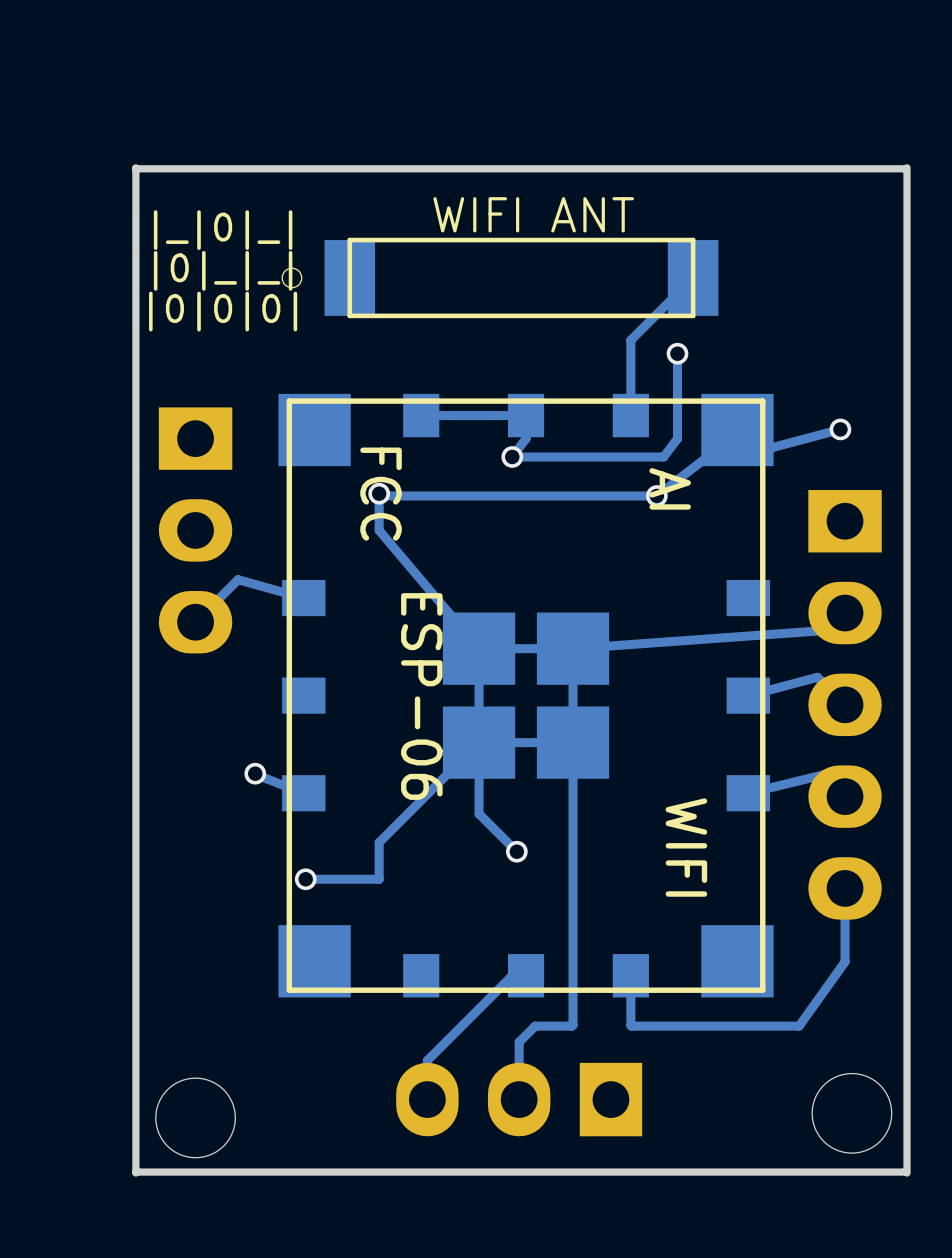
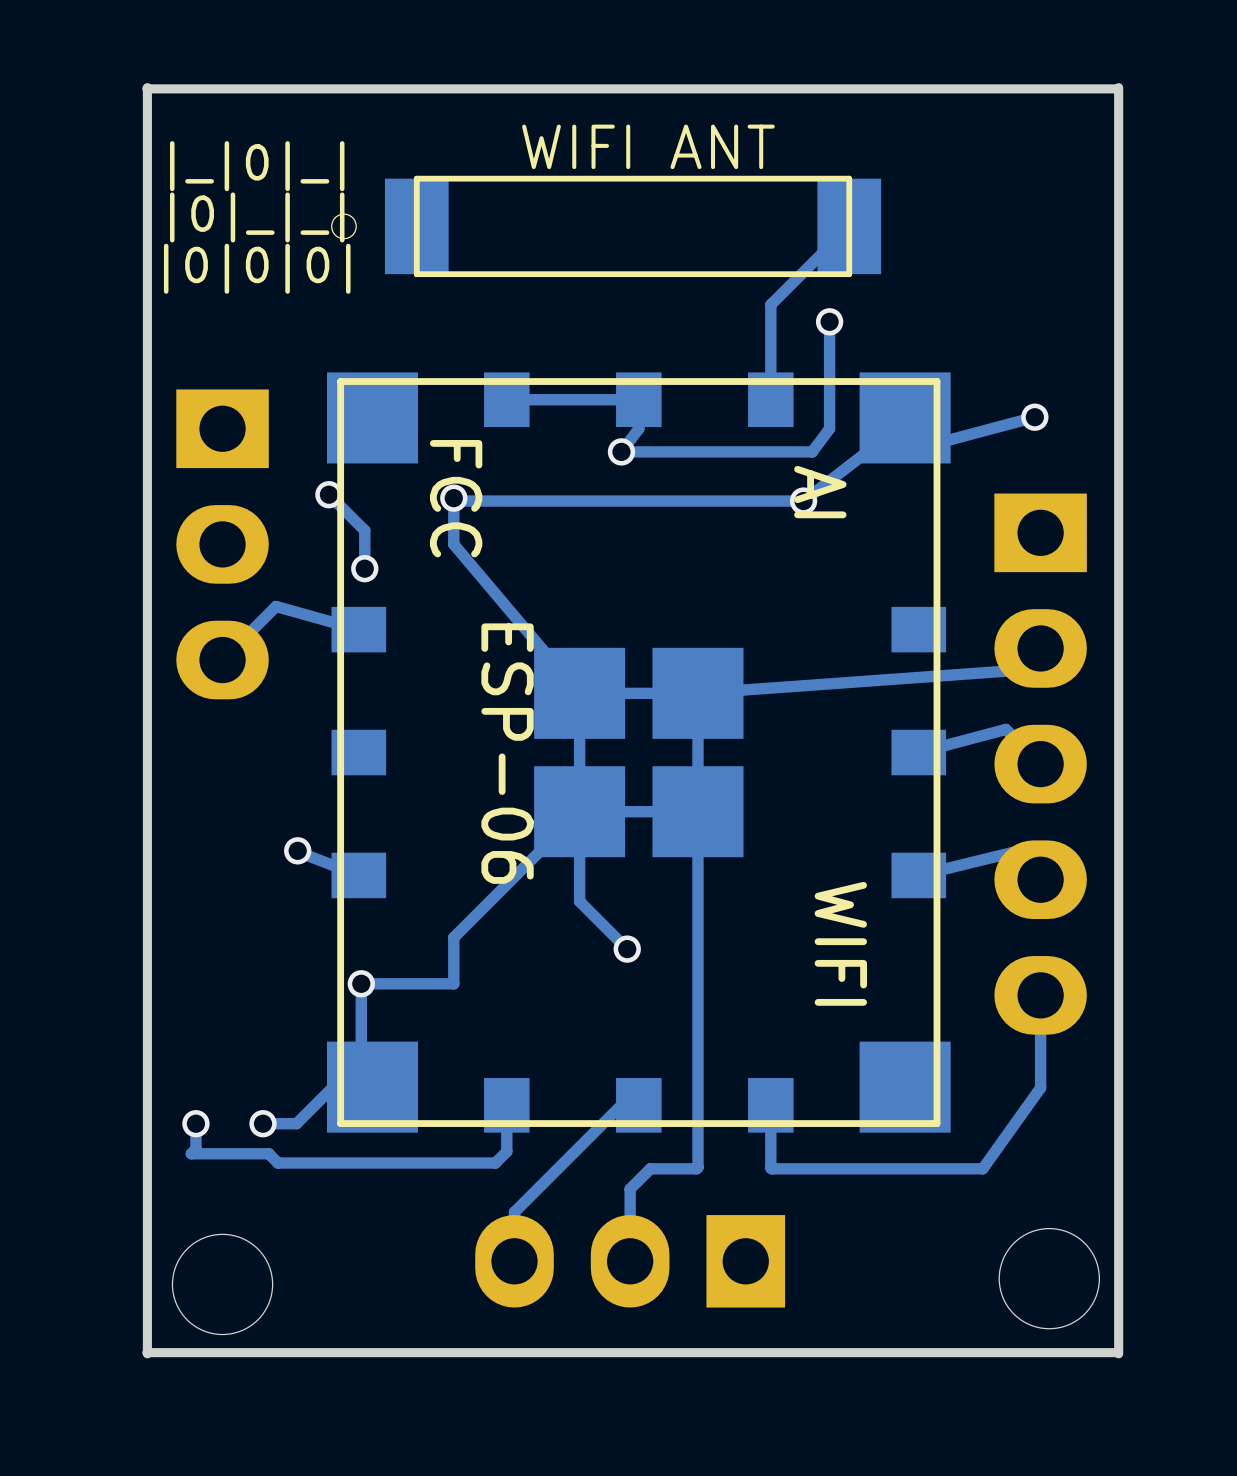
track: none -> (328, 494) (364, 530) (364, 568)
via: none -> (328, 494)
via: none -> (364, 568)
track: none -> (361, 983) (361, 1075) (372, 1087) (333, 1087) (296, 1123) (263, 1123)
track: none -> (506, 1105) (506, 1151) (495, 1163) (278, 1163) (268, 1153) (191, 1153) (195, 1149) (195, 1123)
via: none -> (195, 1123)
via: none -> (263, 1123)

